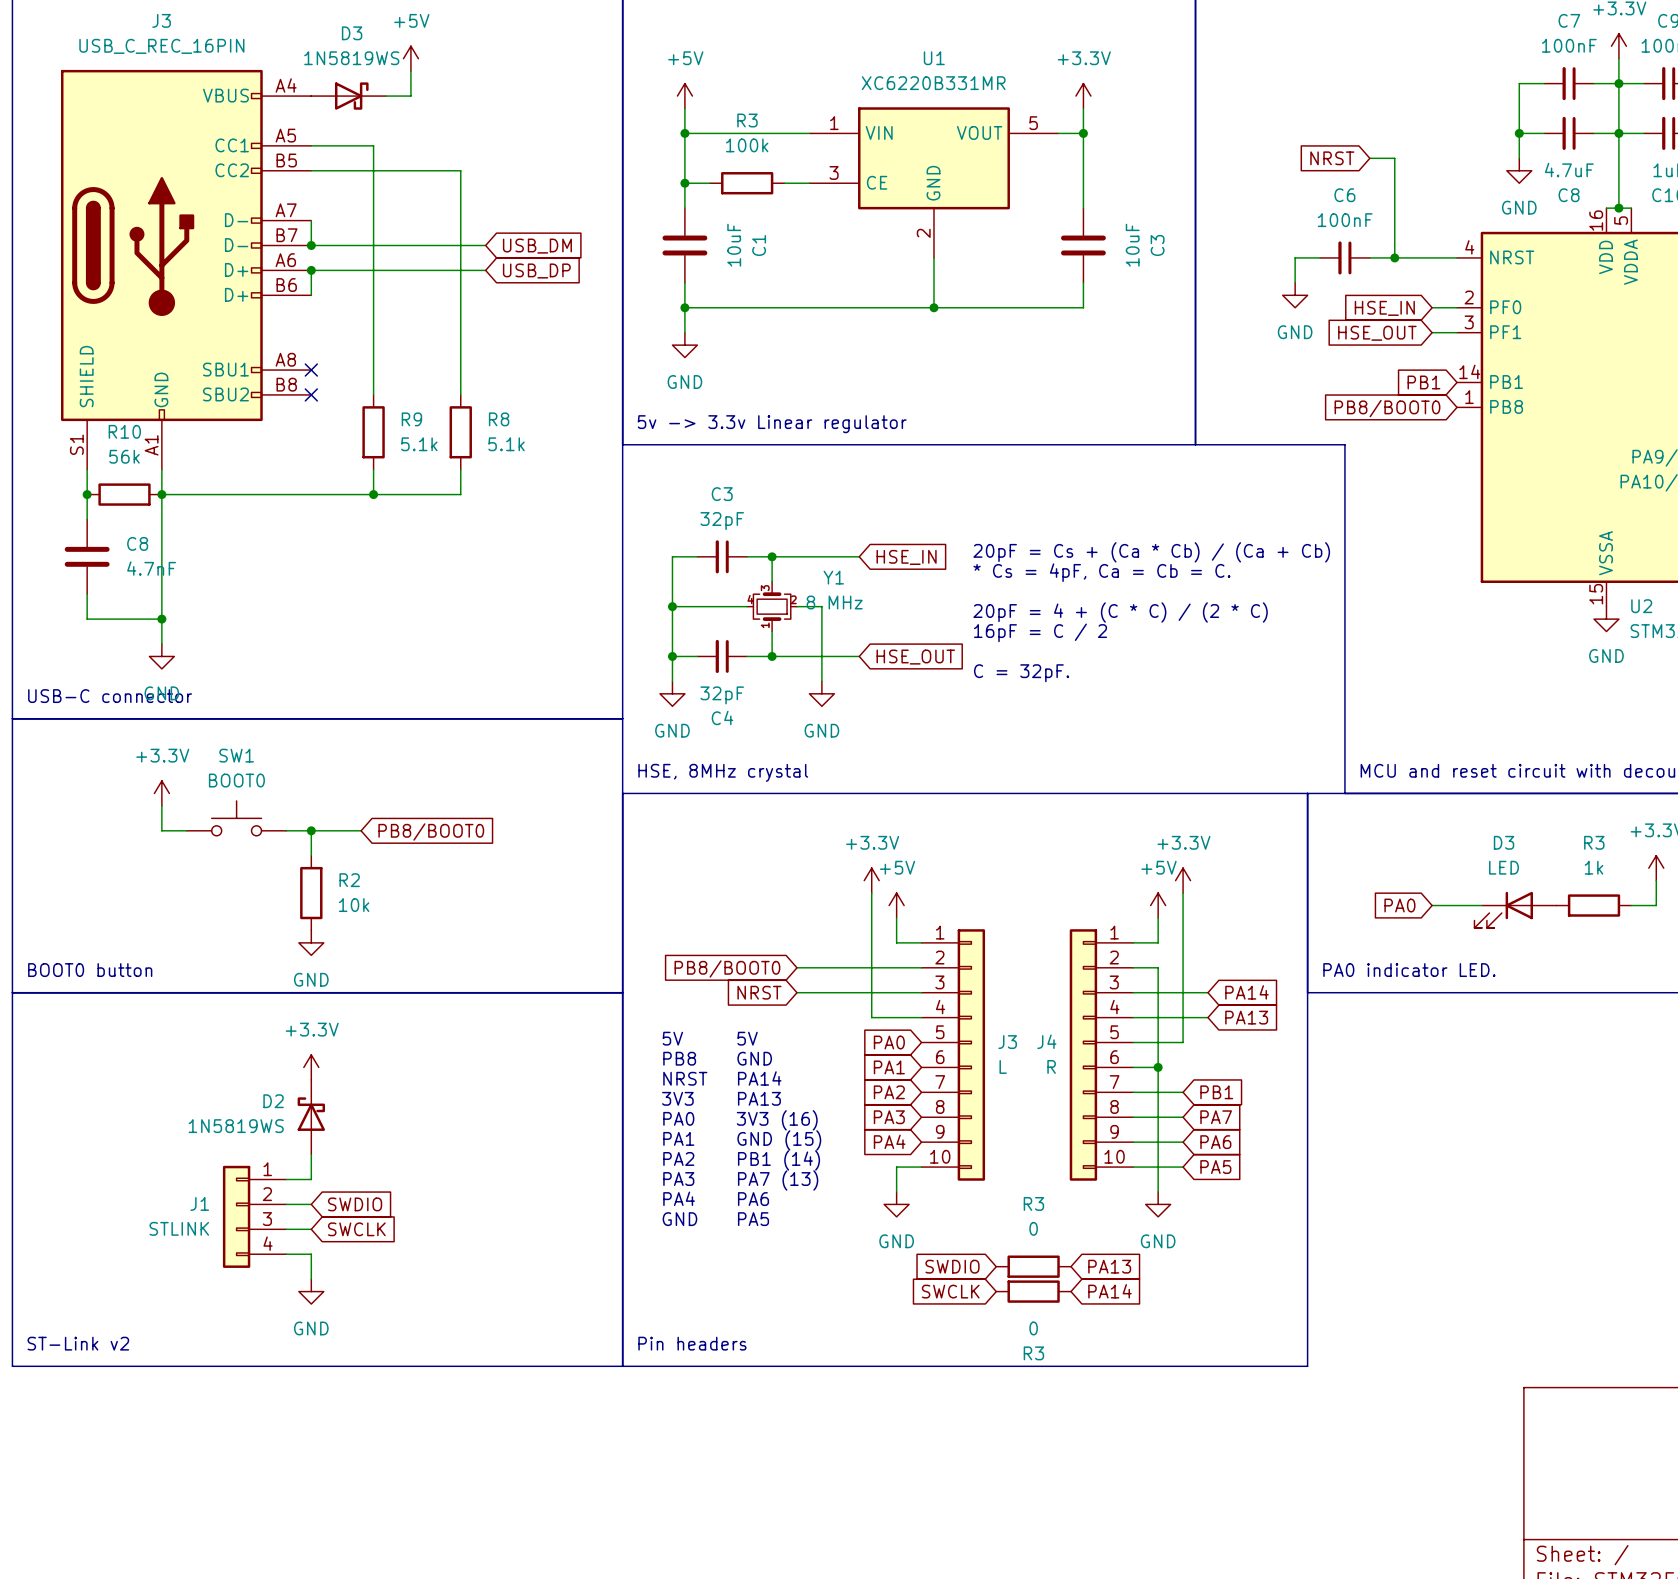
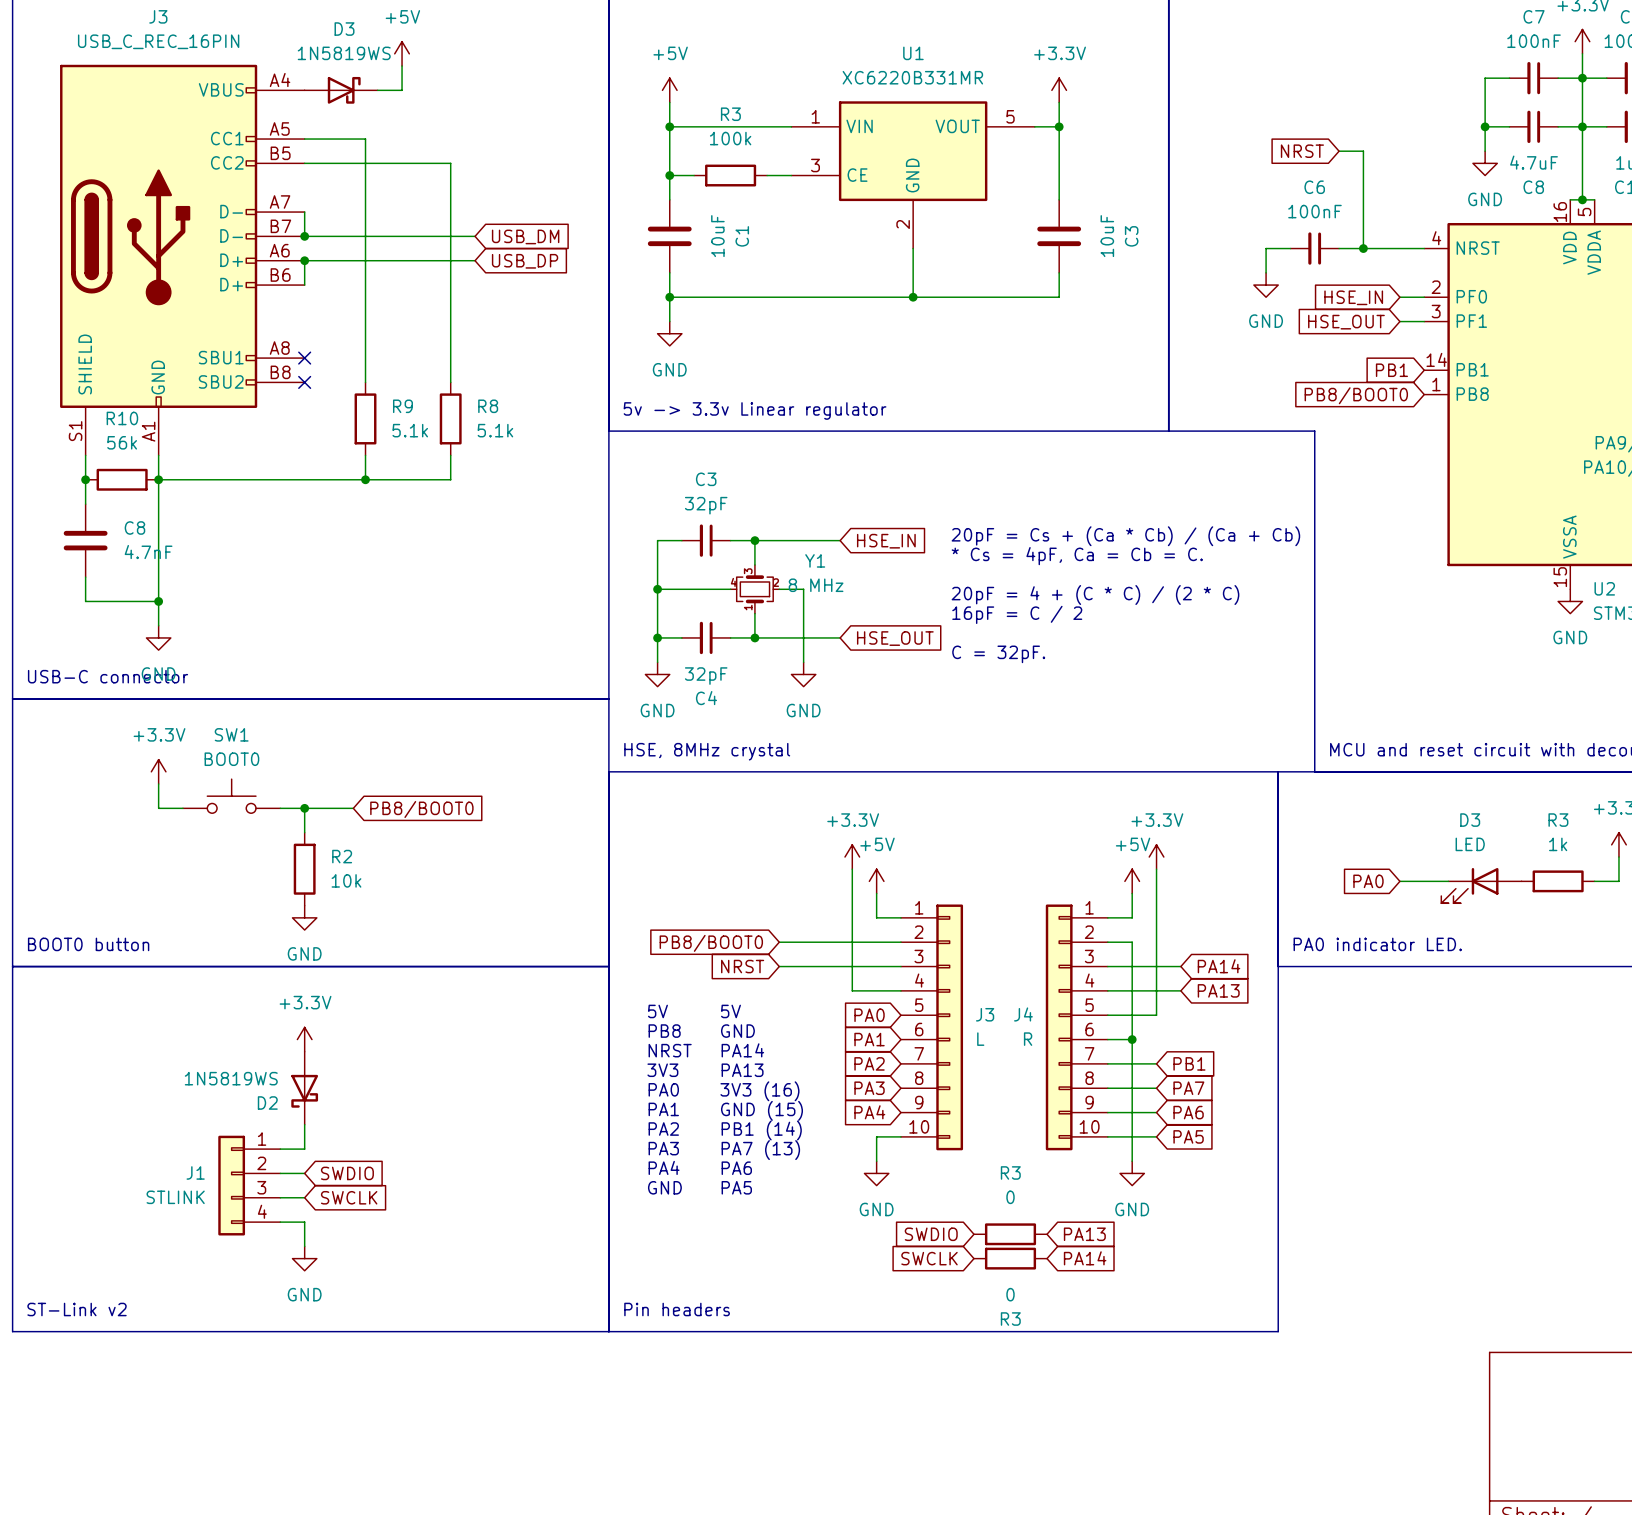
D2 flip: as is (311, 1114) -> up-down (304, 1091)

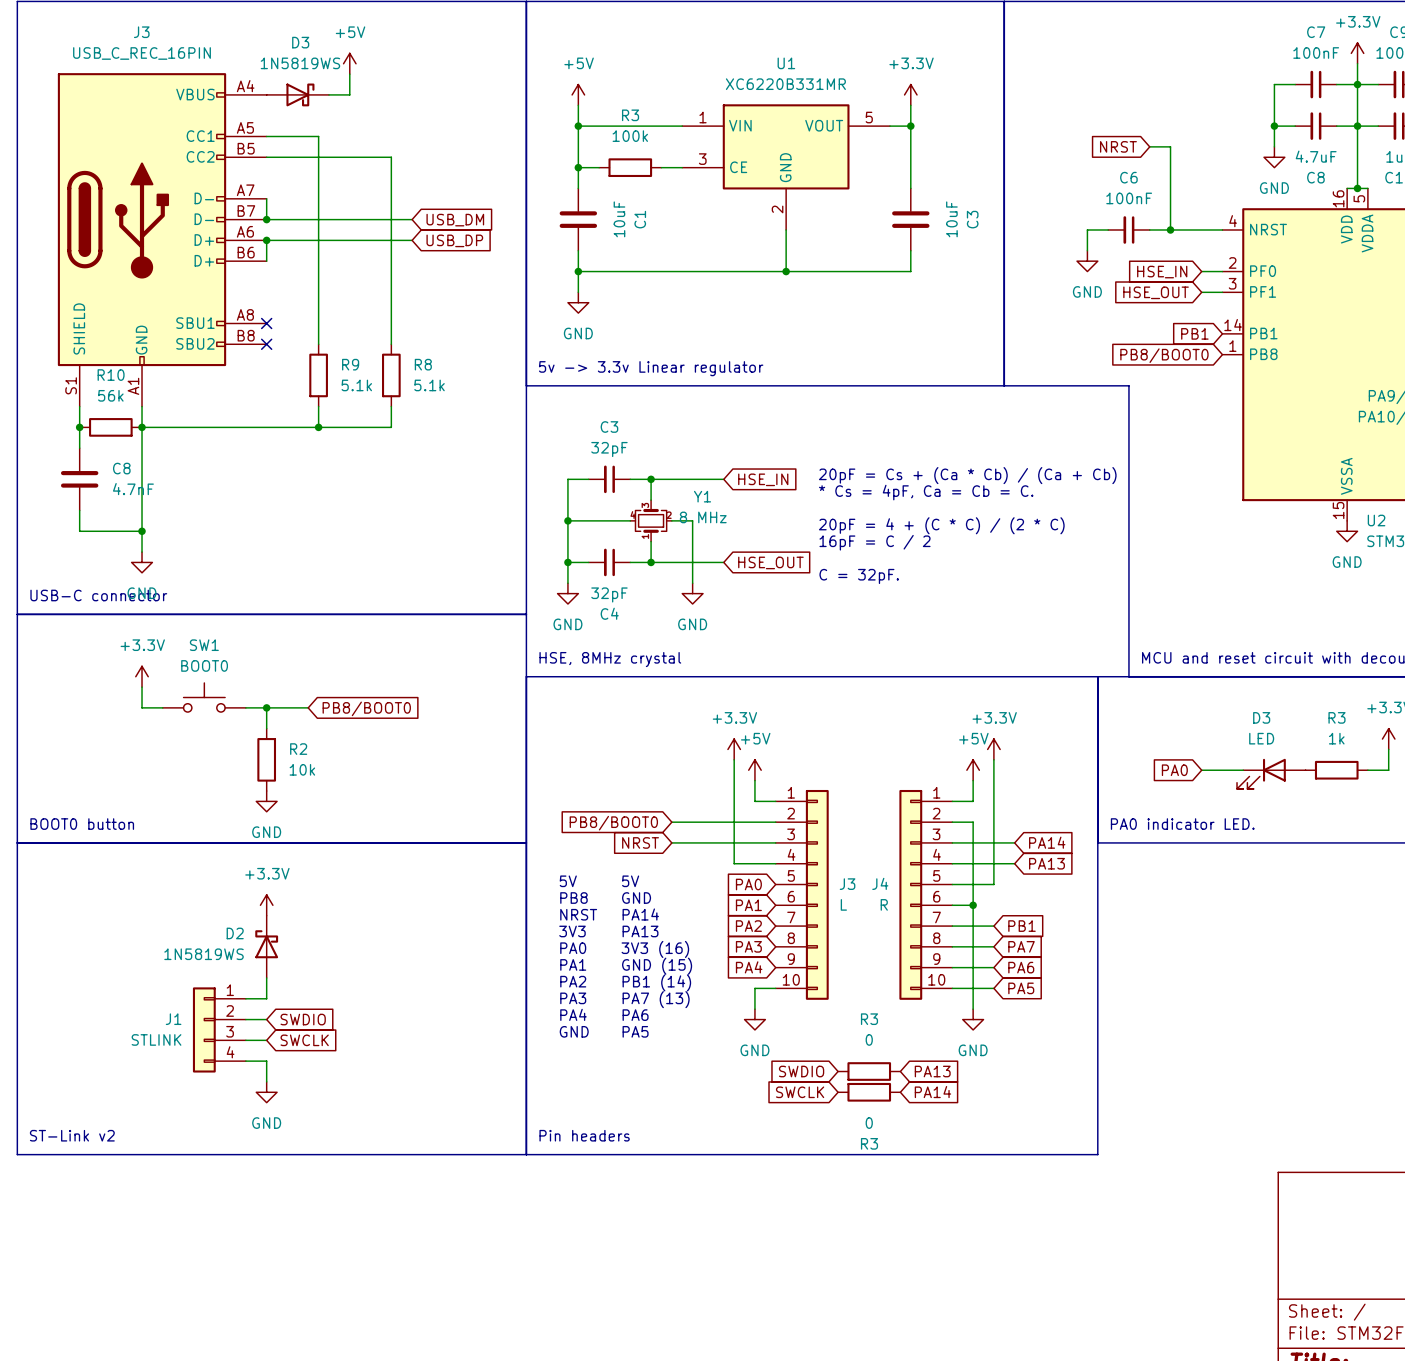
D2 flip: as is (304, 1091) -> up-down (266, 944)

